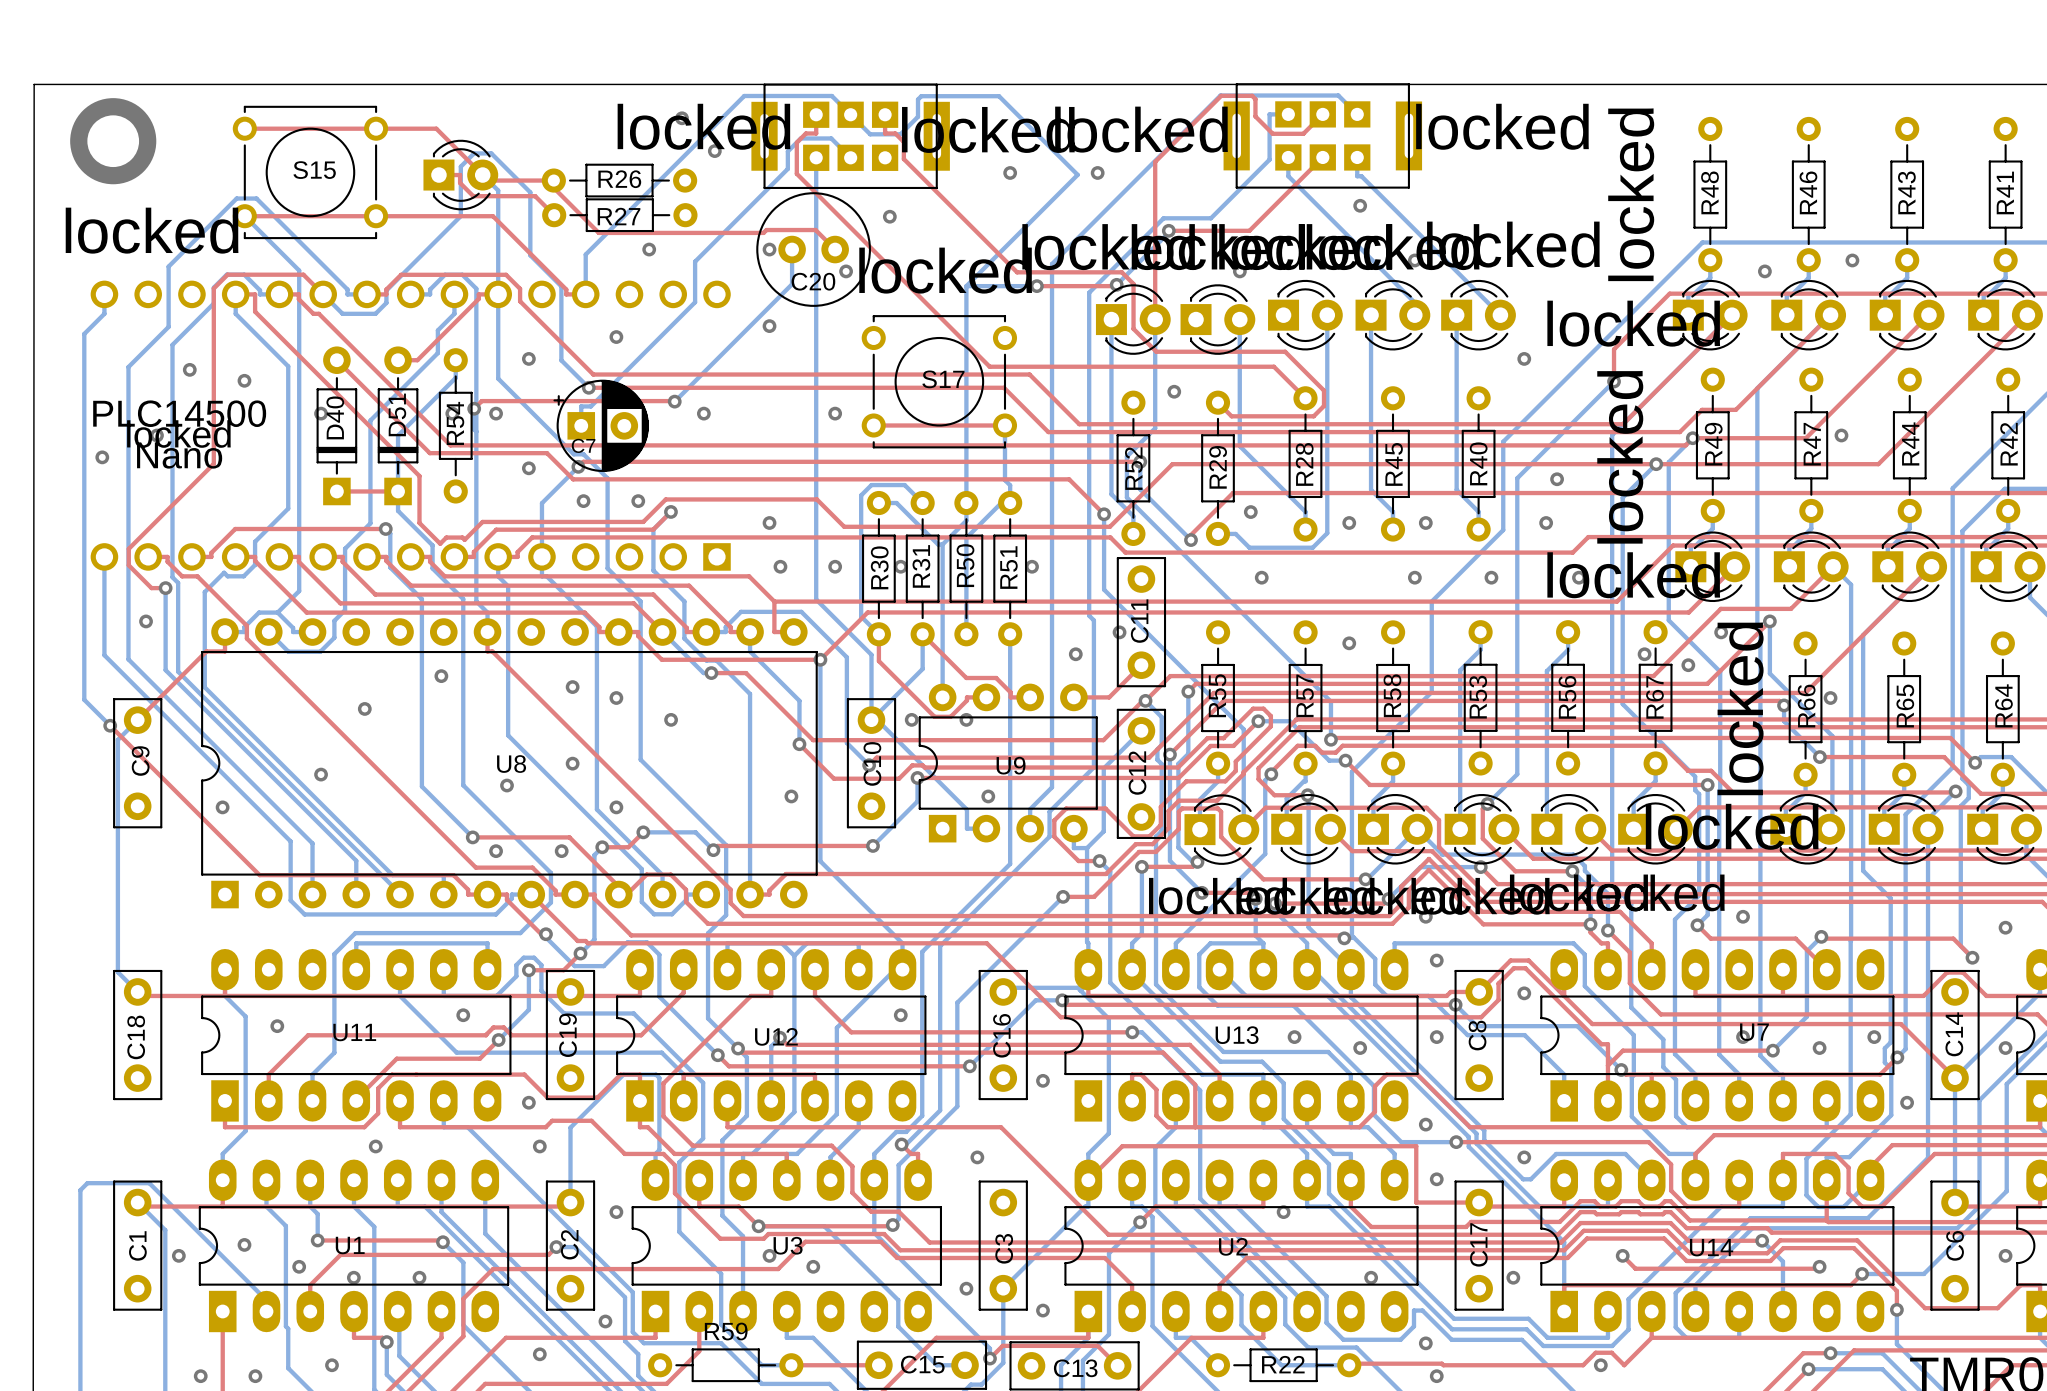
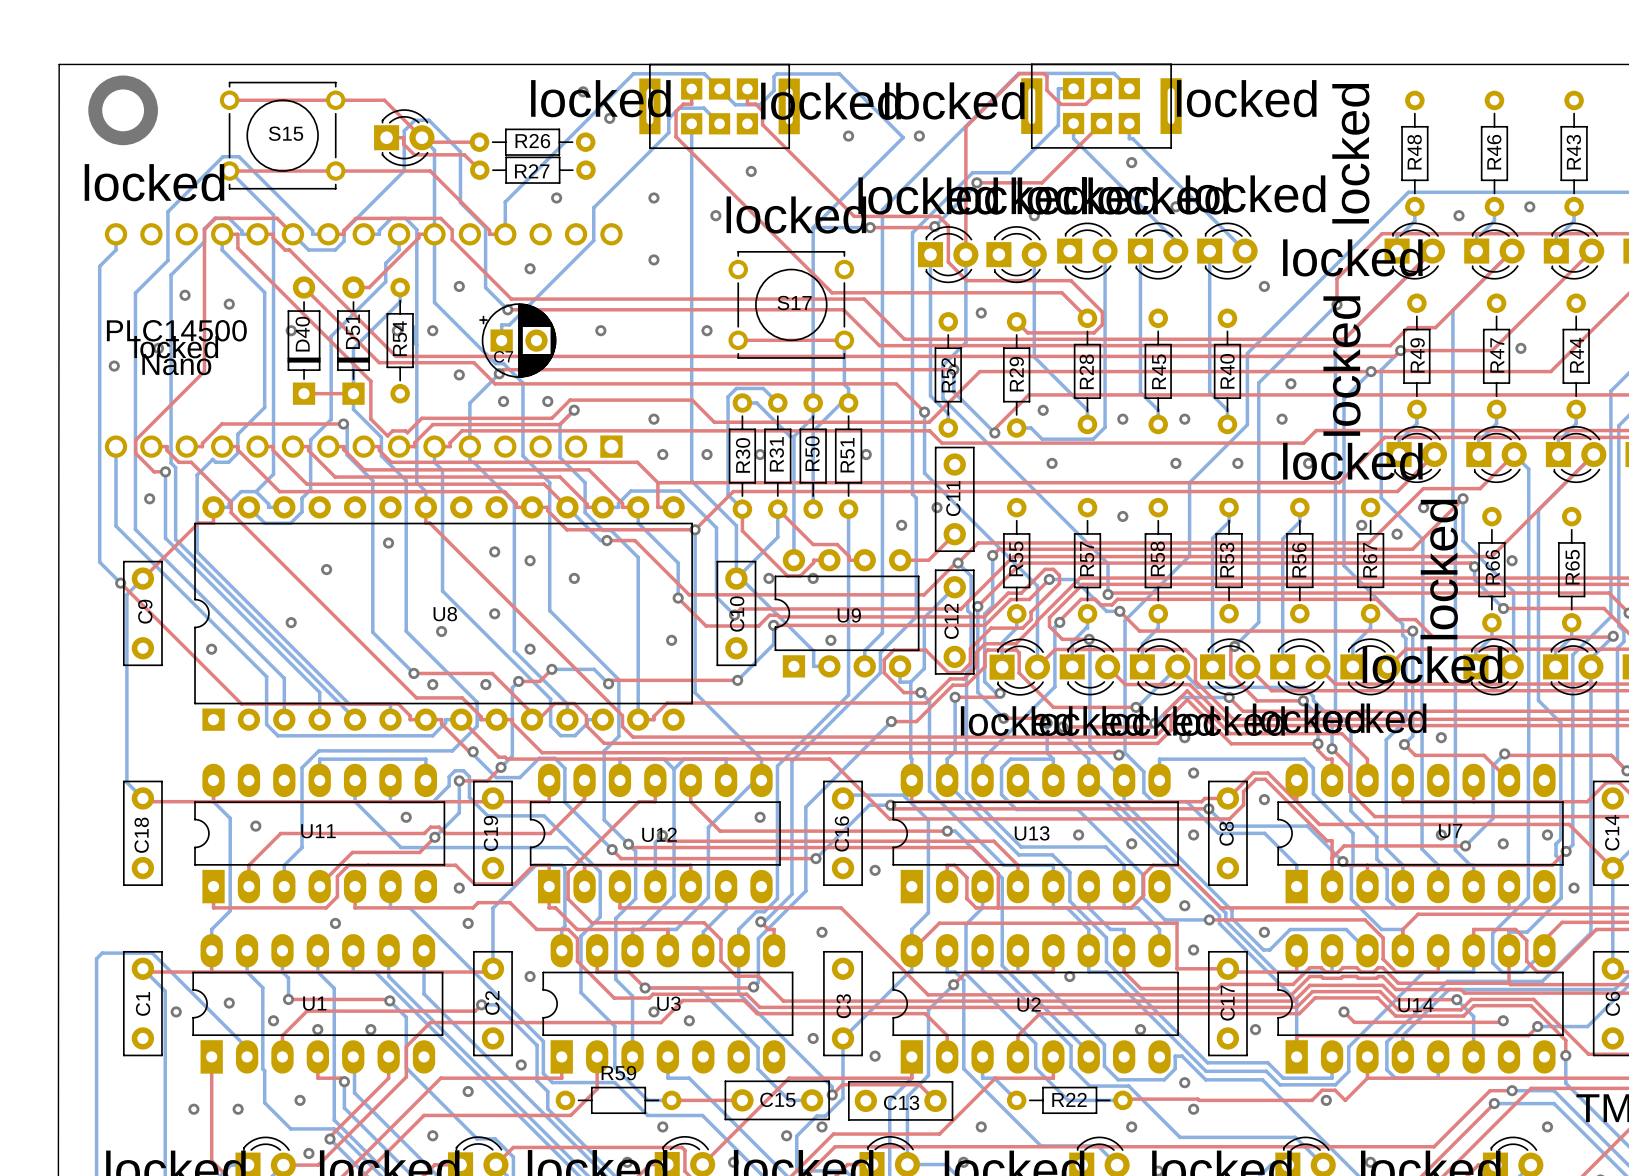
top track: (546, 180) (598, 232) (763, 232) (766, 230) (815, 230) (835, 249) -> none
bottom track: (792, 249) (792, 284) (674, 401) -> none
C20: (813, 249) -> none
top track: (674, 401) (481, 401) (474, 408) -> none
via: (674, 401) -> none
via: (474, 408) -> none

